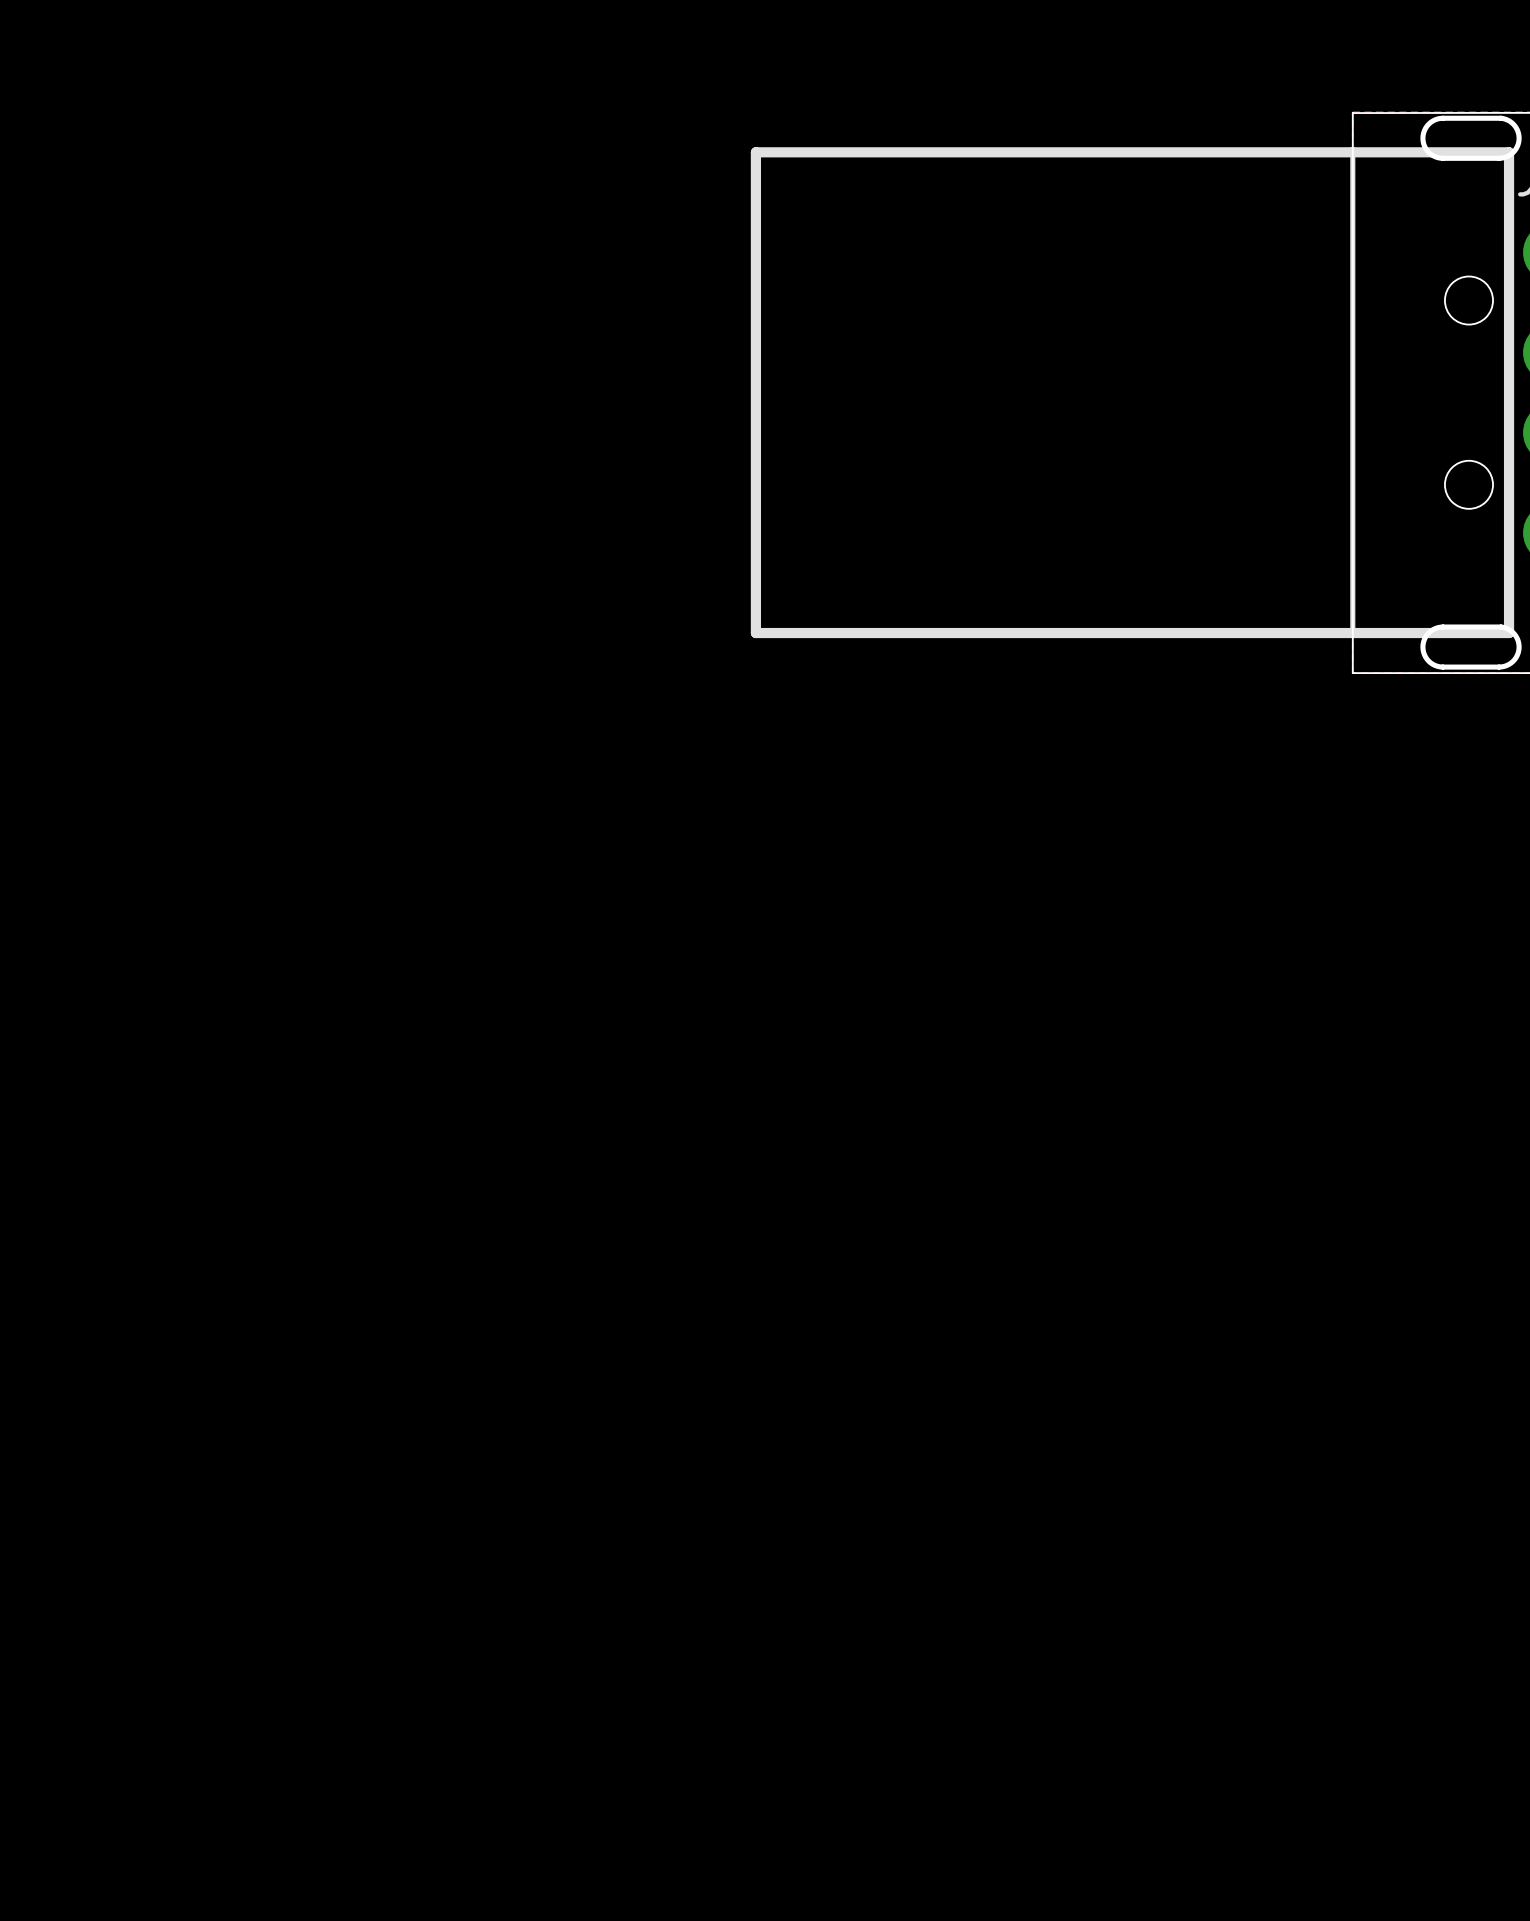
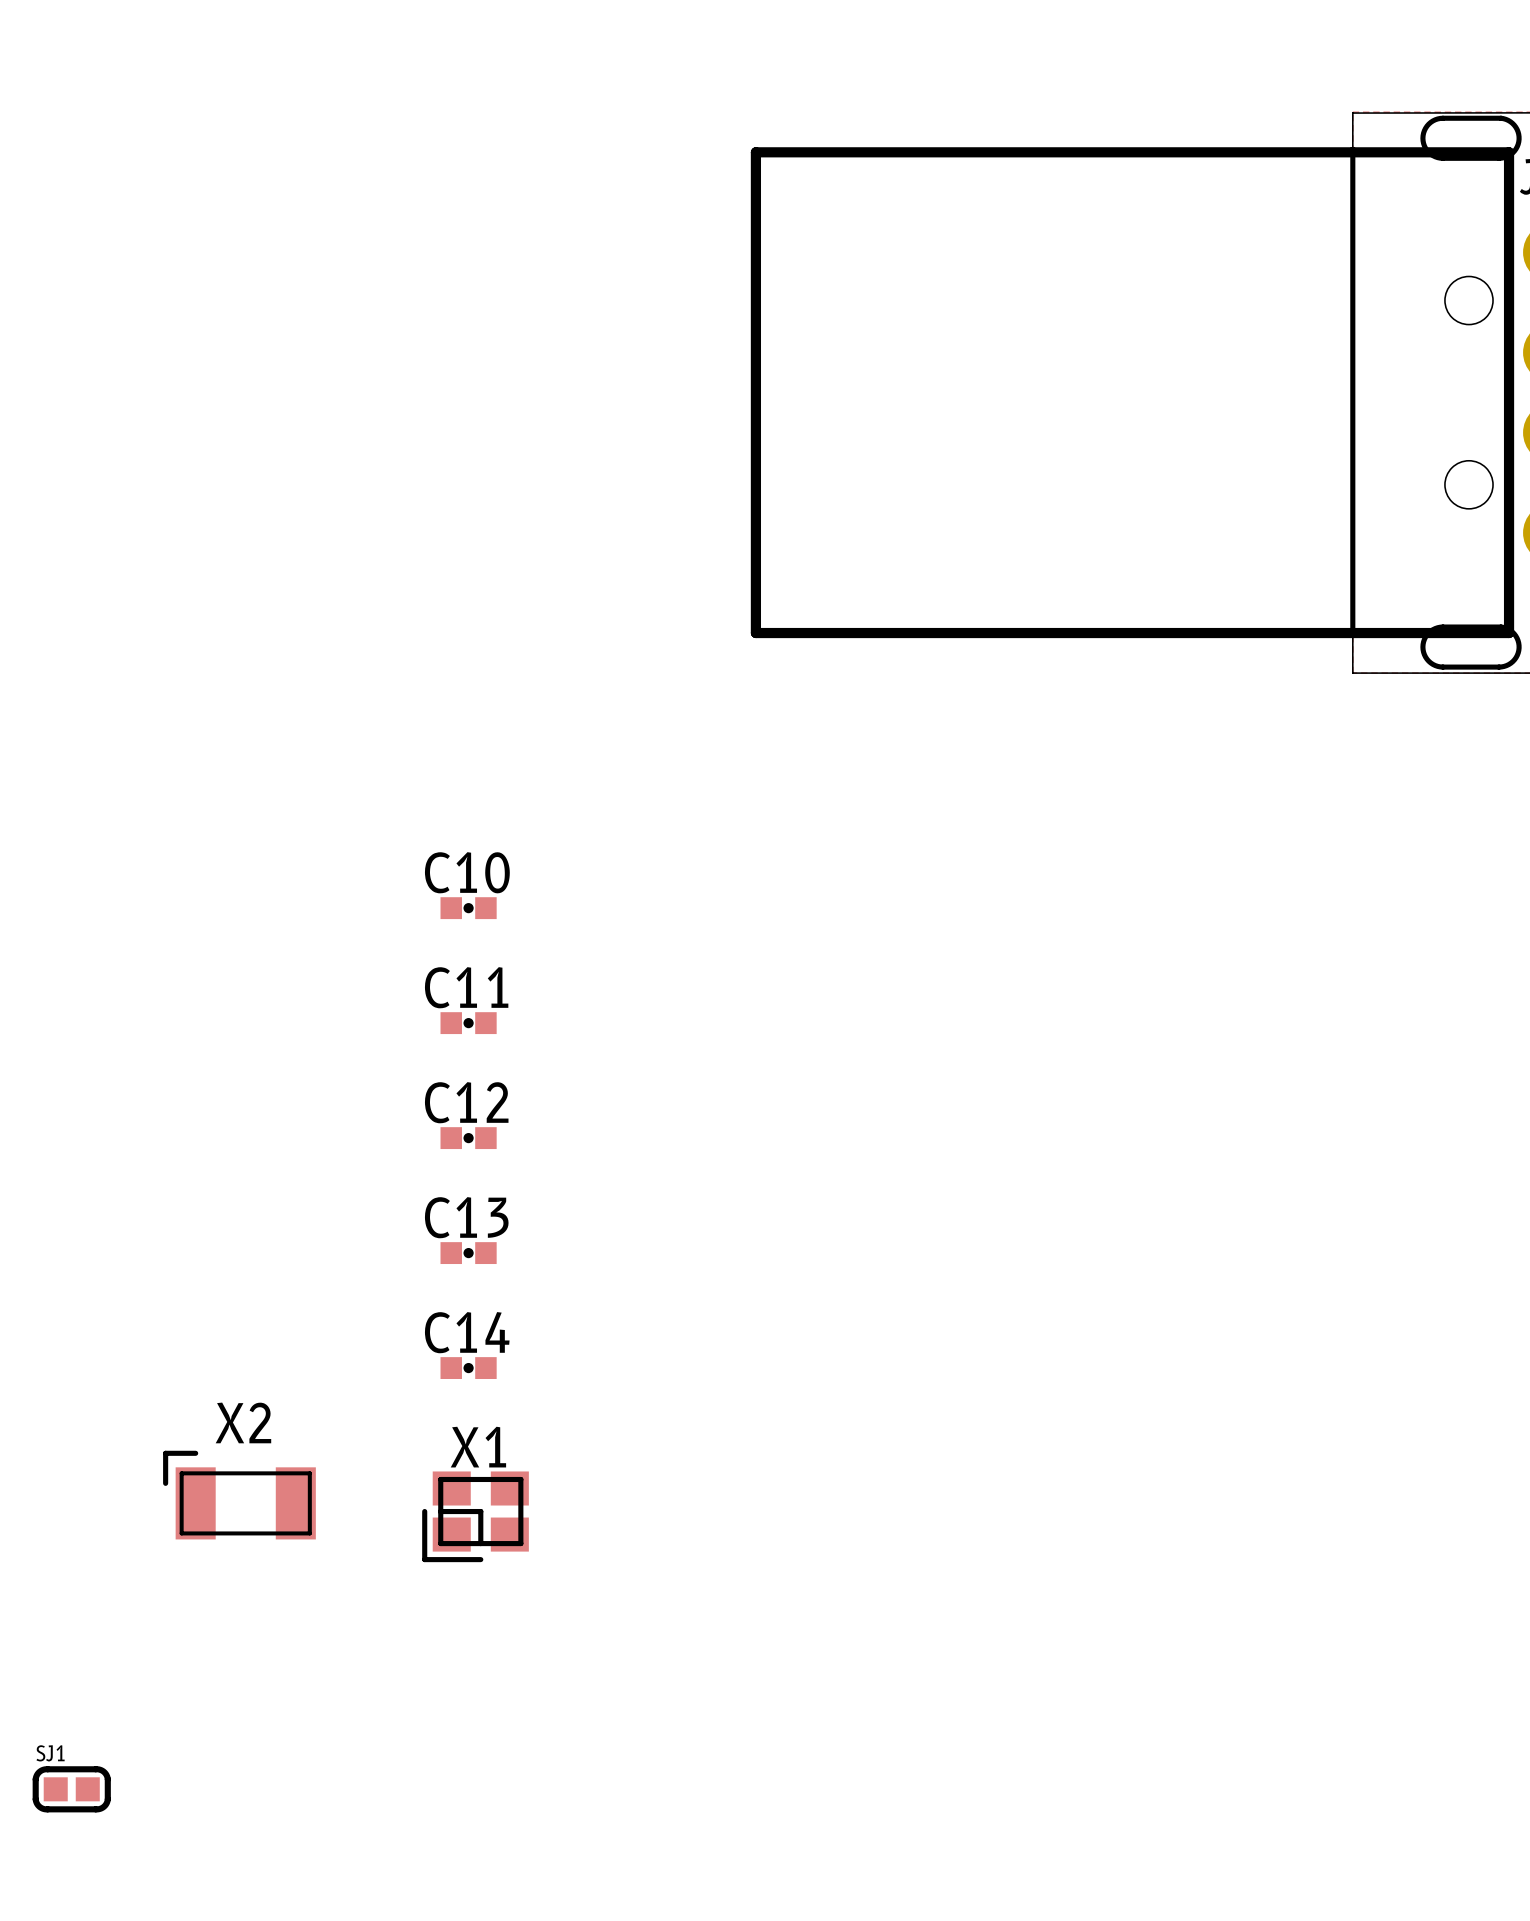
C10: none -> (468, 908)
C11: none -> (468, 1023)
C12: none -> (468, 1138)
C13: none -> (468, 1253)
C14: none -> (468, 1368)
X2: none -> (239, 1495)
X1: none -> (475, 1516)
SJ1: none -> (71, 1789)

